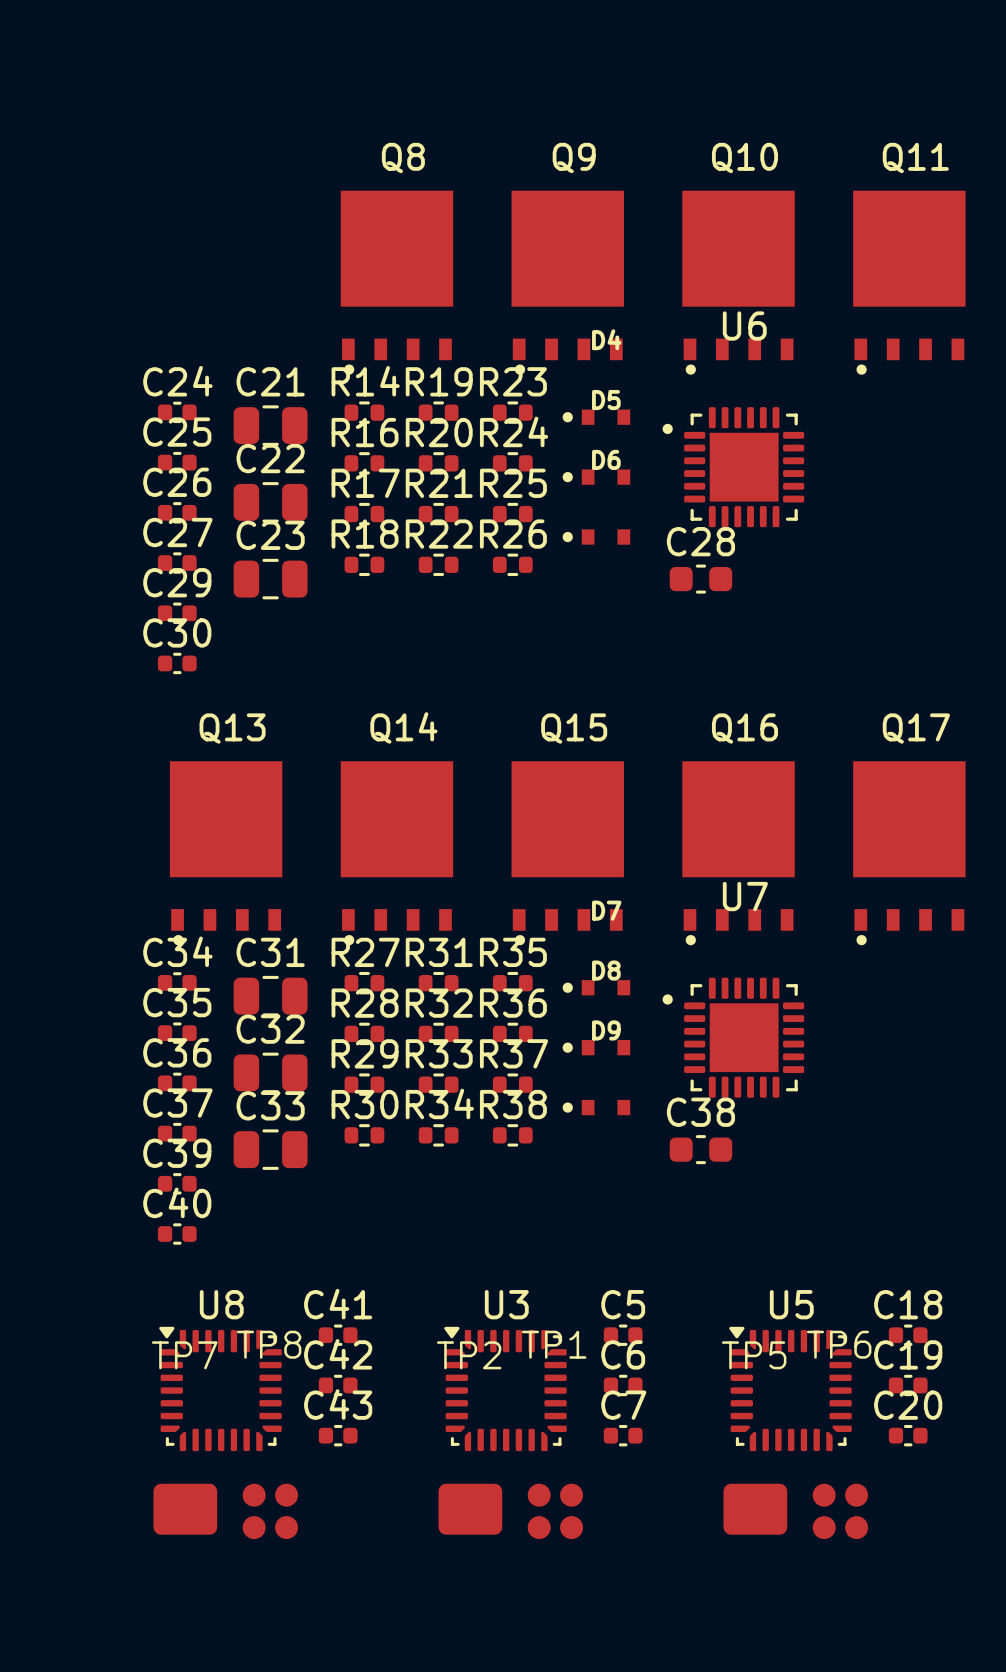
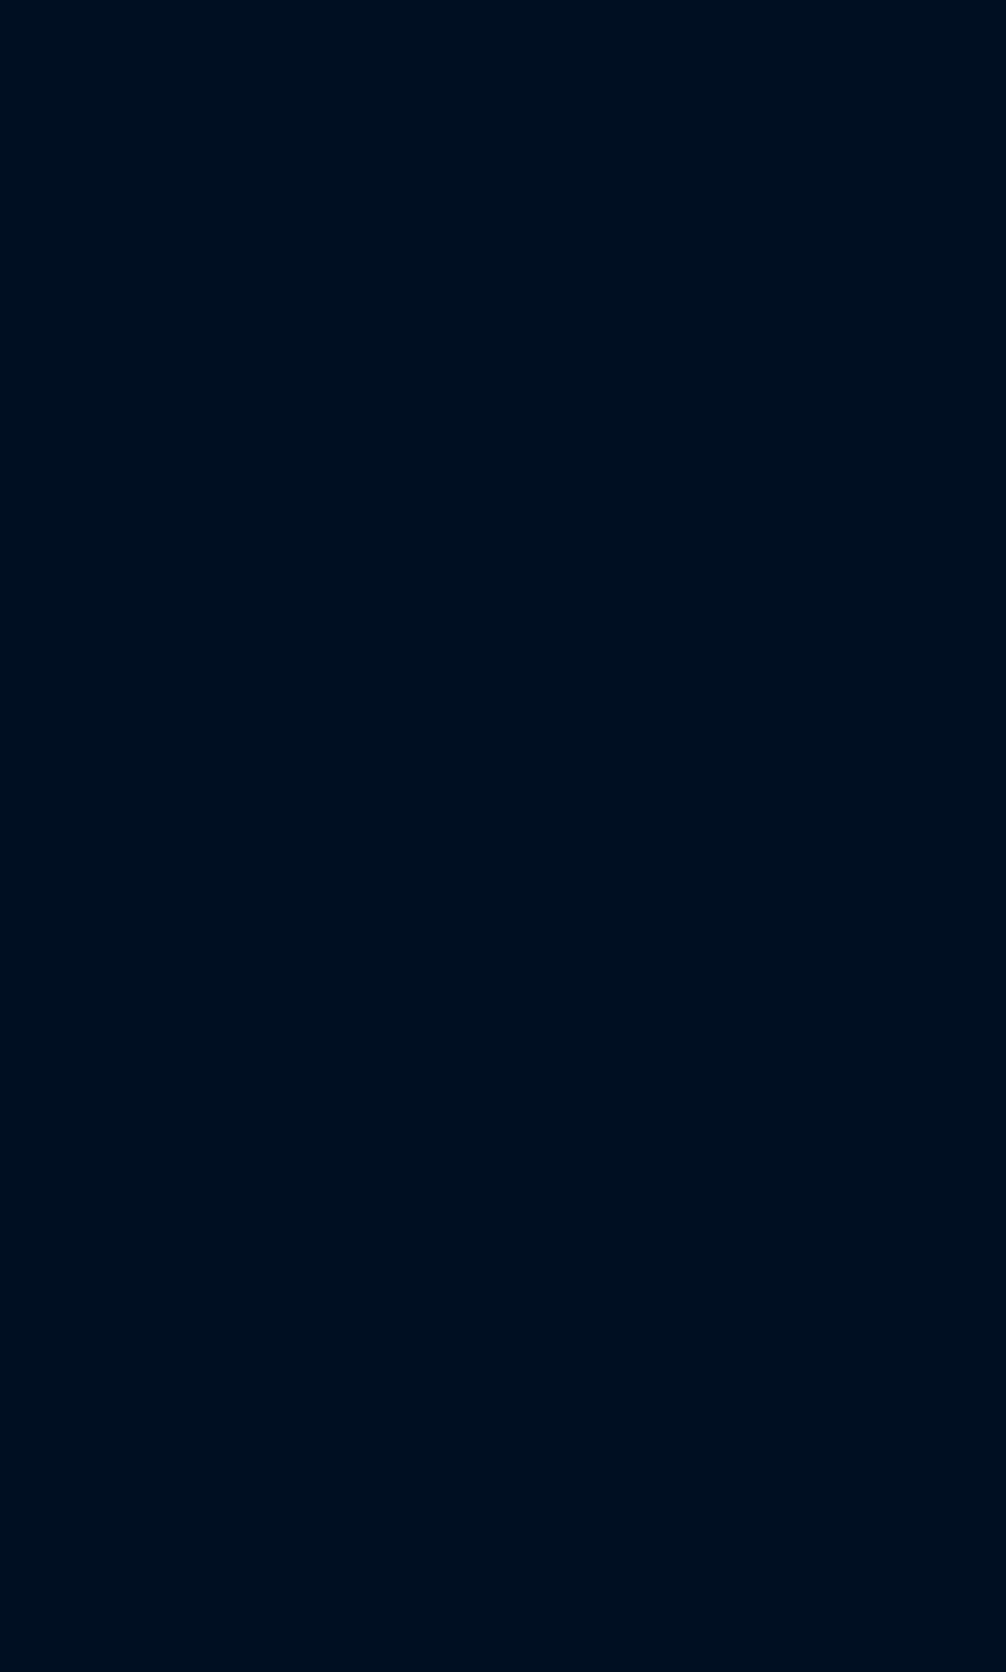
Q8: (396, 282) -> none
Q9: (567, 282) -> none
Q10: (738, 282) -> none
Q11: (909, 282) -> none
C24: (177, 412) -> none
R14: (364, 412) -> none
R19: (438, 412) -> none
R23: (512, 412) -> none
D4: (596, 417) -> none
C21: (270, 425) -> none
C25: (177, 462) -> none
R16: (364, 463) -> none
R20: (438, 463) -> none
R24: (512, 463) -> none
U6: (733, 467) -> none
D5: (596, 477) -> none
C22: (270, 502) -> none
C26: (177, 512) -> none
R17: (364, 514) -> none
R21: (438, 514) -> none
R25: (512, 514) -> none
D6: (596, 537) -> none
C27: (177, 563) -> none
R18: (364, 564) -> none
R22: (438, 564) -> none
R26: (512, 564) -> none
C23: (270, 579) -> none
C28: (700, 579) -> none
C29: (177, 613) -> none
C30: (177, 663) -> none
Q13: (226, 853) -> none
Q14: (396, 853) -> none
Q15: (567, 853) -> none
Q16: (738, 853) -> none
Q17: (909, 853) -> none
C34: (177, 982) -> none
R27: (364, 983) -> none
R31: (438, 983) -> none
R35: (512, 983) -> none
D7: (596, 987) -> none
C31: (270, 996) -> none
C35: (177, 1033) -> none
R28: (364, 1033) -> none
R32: (438, 1033) -> none
R36: (512, 1033) -> none
U7: (733, 1037) -> none
D8: (596, 1047) -> none
C32: (270, 1072) -> none
C36: (177, 1083) -> none
R29: (364, 1084) -> none
R33: (438, 1084) -> none
R37: (512, 1084) -> none
D9: (596, 1107) -> none
C37: (177, 1133) -> none
R30: (364, 1135) -> none
R34: (438, 1135) -> none
R38: (512, 1135) -> none
C33: (270, 1149) -> none
C38: (700, 1149) -> none
C39: (177, 1183) -> none
C40: (177, 1234) -> none
C41: (338, 1335) -> none
C5: (623, 1335) -> none
C18: (908, 1335) -> none
C42: (338, 1385) -> none
C6: (623, 1385) -> none
C19: (908, 1385) -> none
U8: (220, 1388) -> none
U3: (505, 1388) -> none
U5: (790, 1388) -> none
C43: (338, 1435) -> none
C7: (623, 1435) -> none
C20: (908, 1435) -> none
TP7: (185, 1509) -> none
TP2: (470, 1509) -> none
TP5: (755, 1509) -> none
TP8: (270, 1511) -> none
TP1: (555, 1511) -> none
TP6: (840, 1511) -> none

